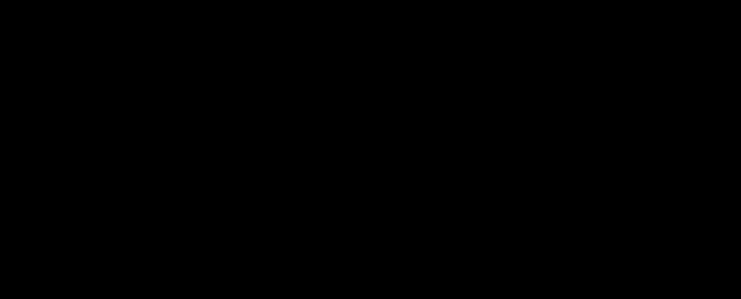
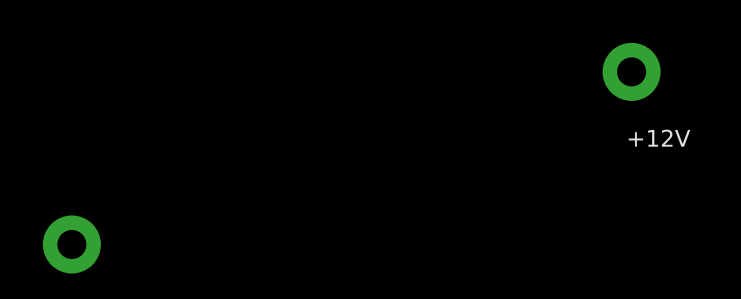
part: none -> (631, 71)
text: none -> +12V (659, 138)
part: none -> (71, 244)

